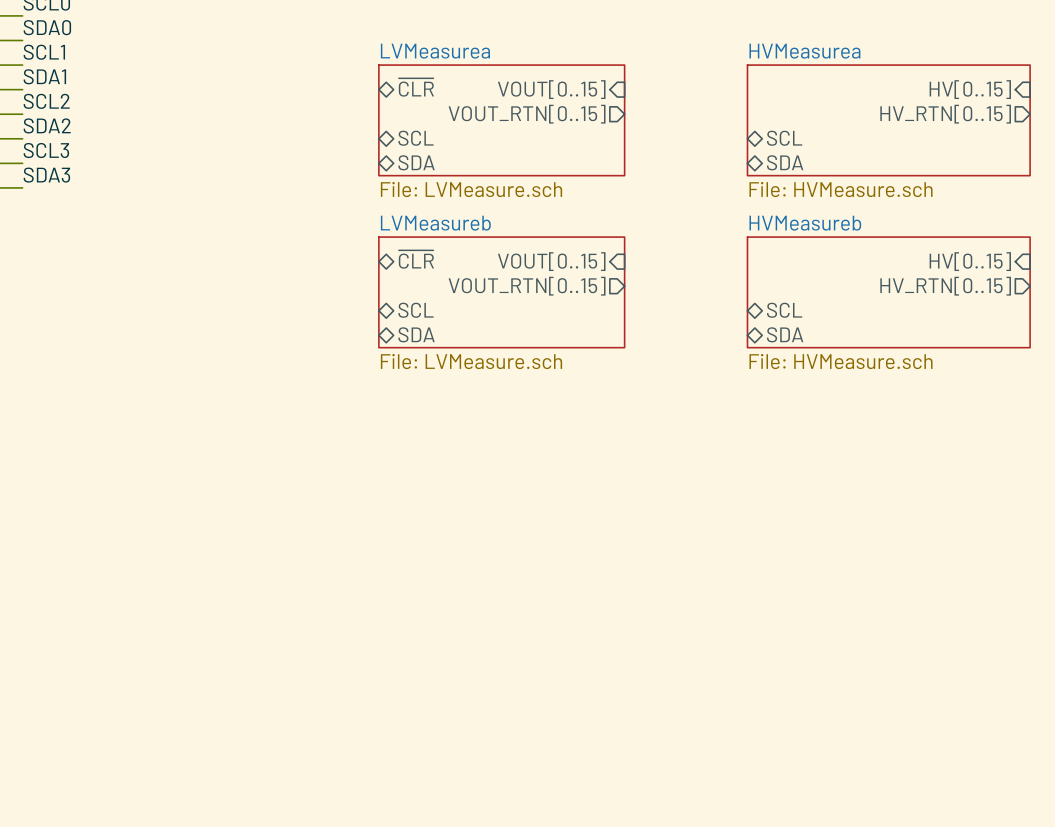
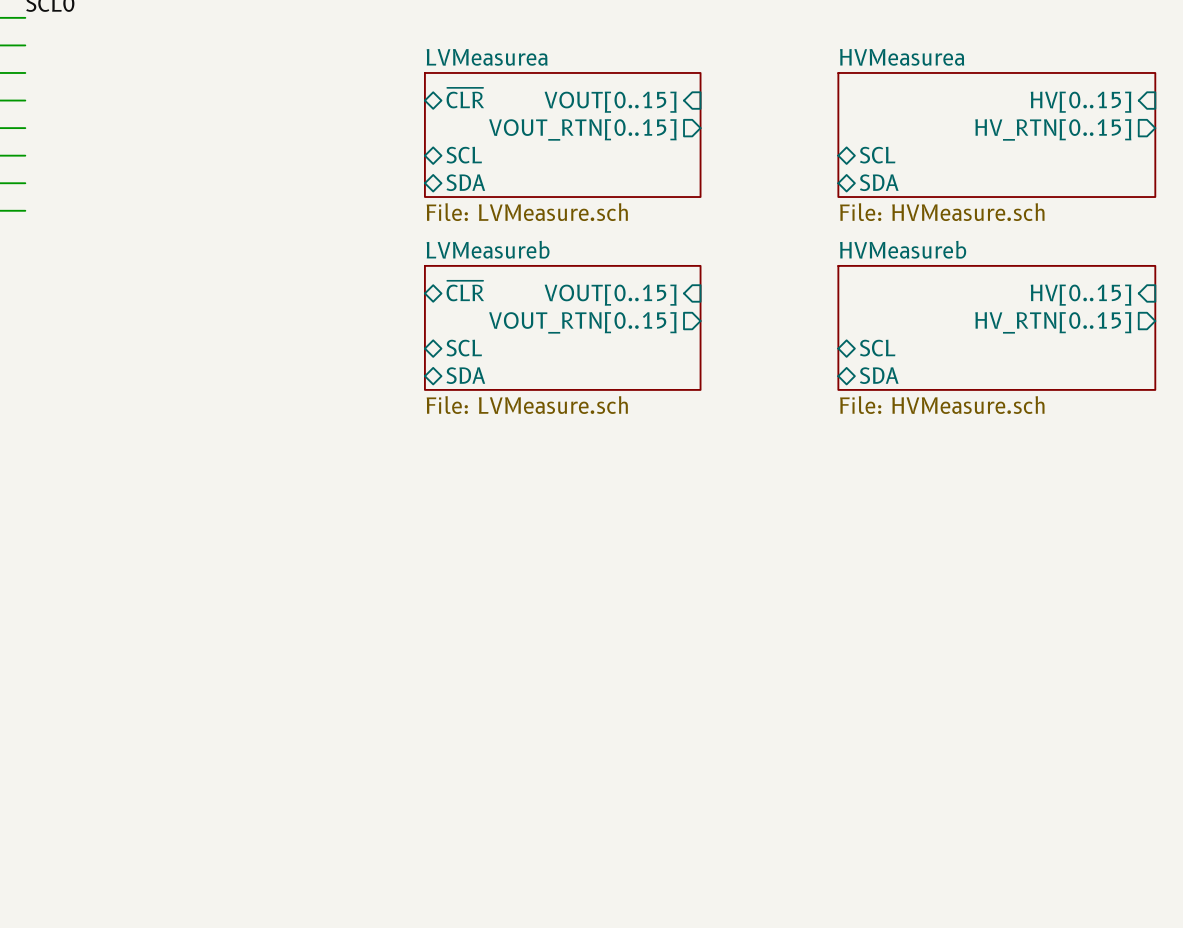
label: SDA0 (47, 27) -> none
label: SCL1 (44, 52) -> none
label: SDA1 (44, 76) -> none
label: SCL2 (46, 101) -> none
label: SDA2 (47, 125) -> none
label: SCL3 (46, 150) -> none
label: SDA3 (46, 175) -> none

